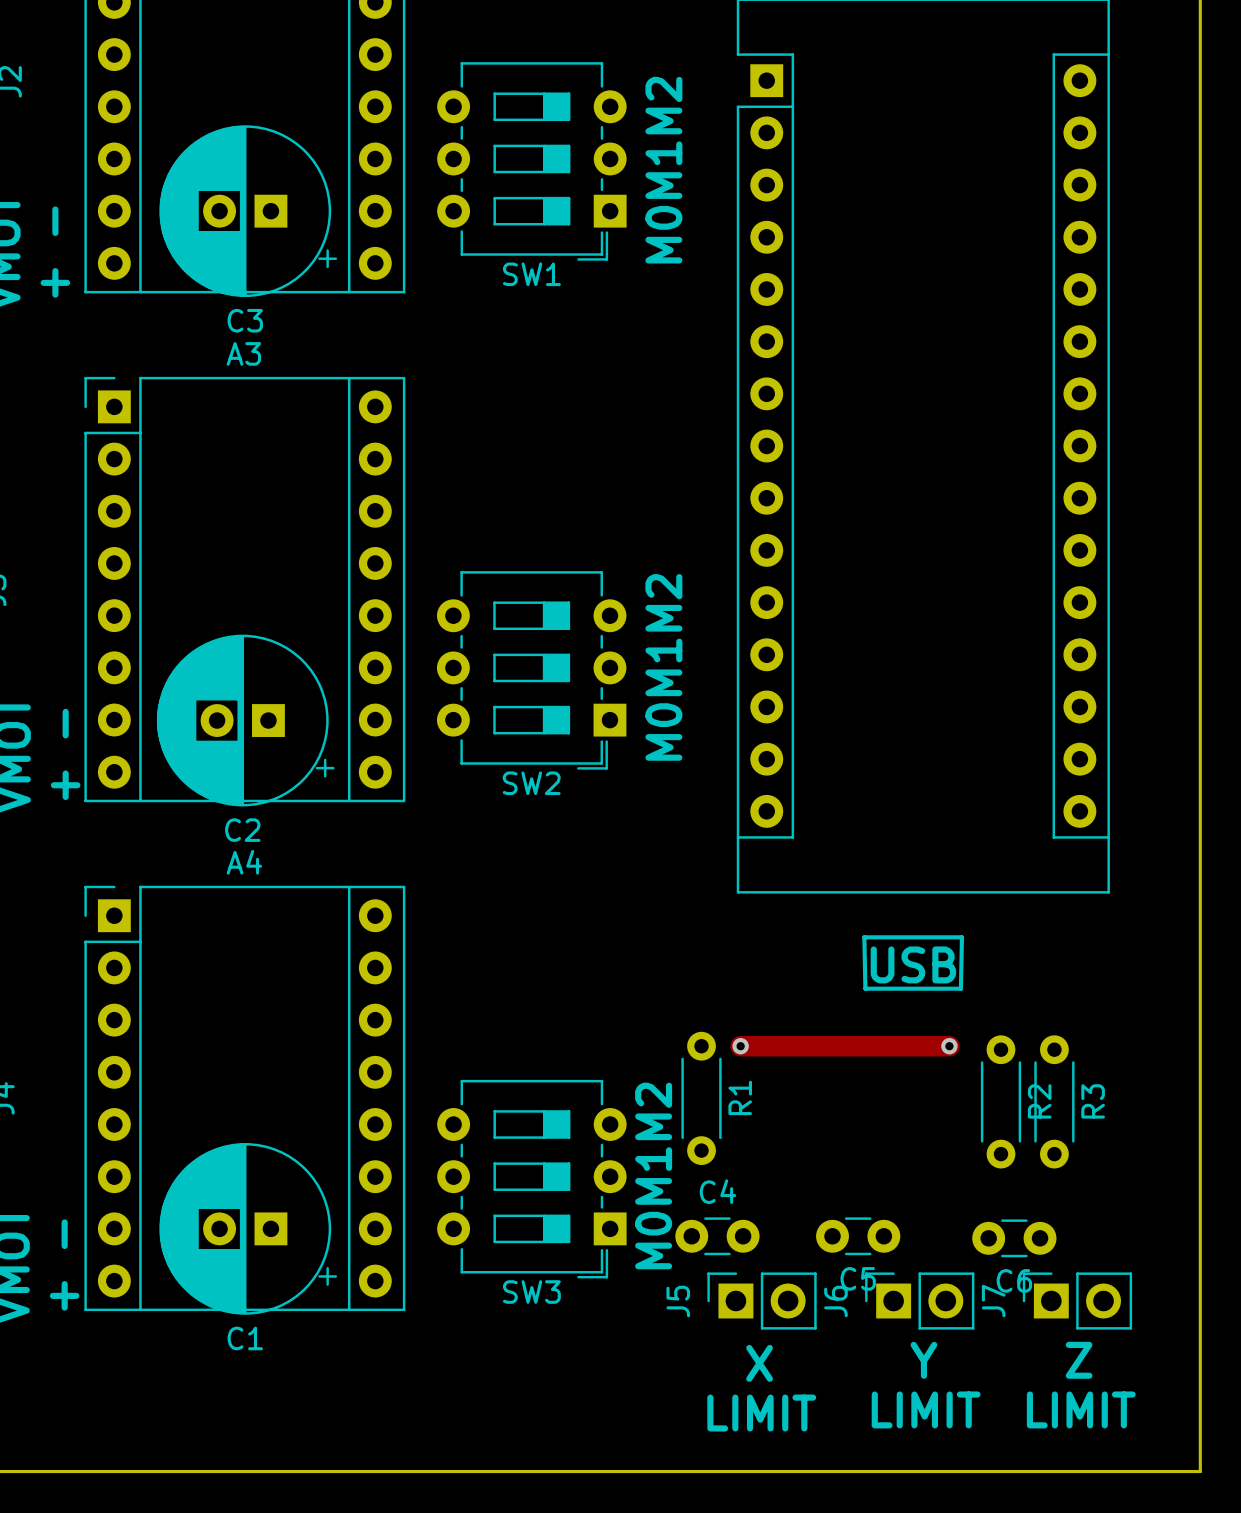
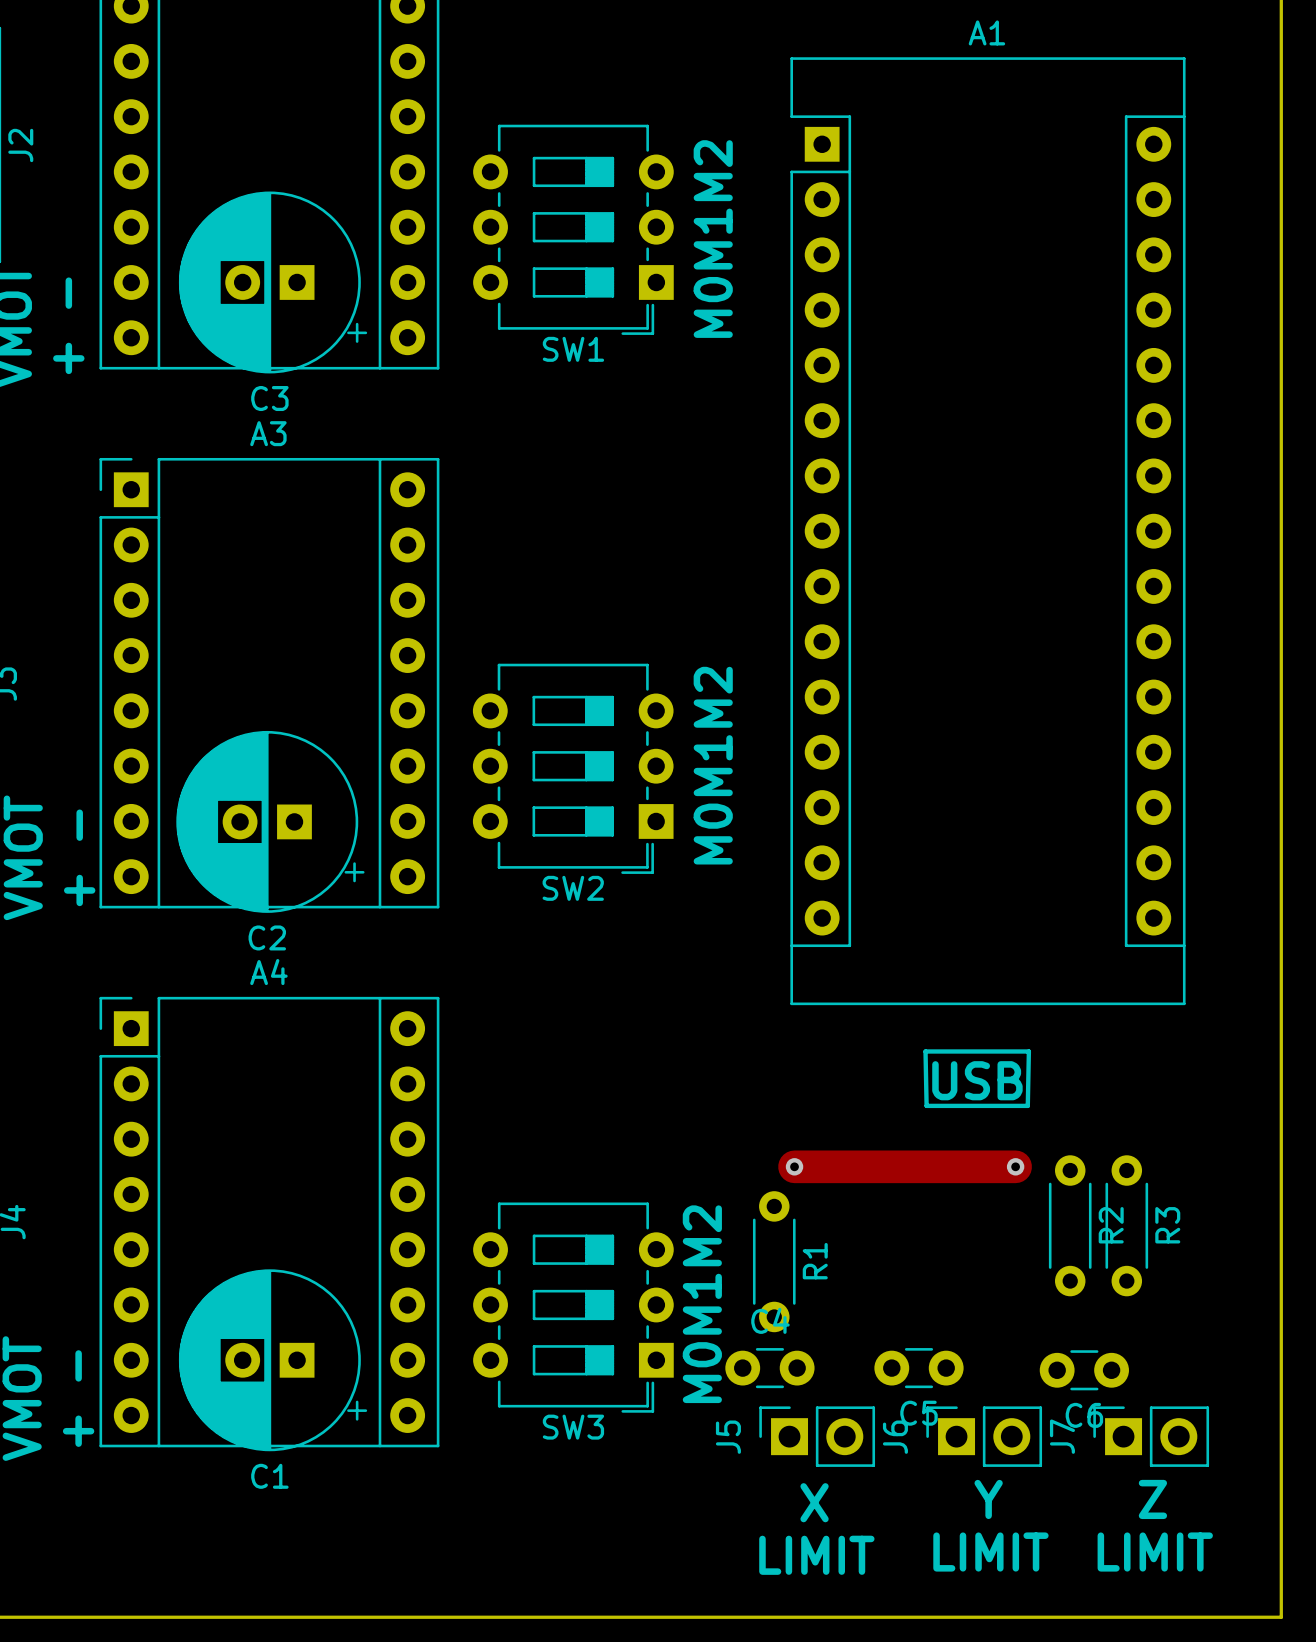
track width: thin (740, 1046) (949, 1046) -> thick (794, 1166) (1015, 1166)
R1 position: (701, 1098) -> (774, 1261)

